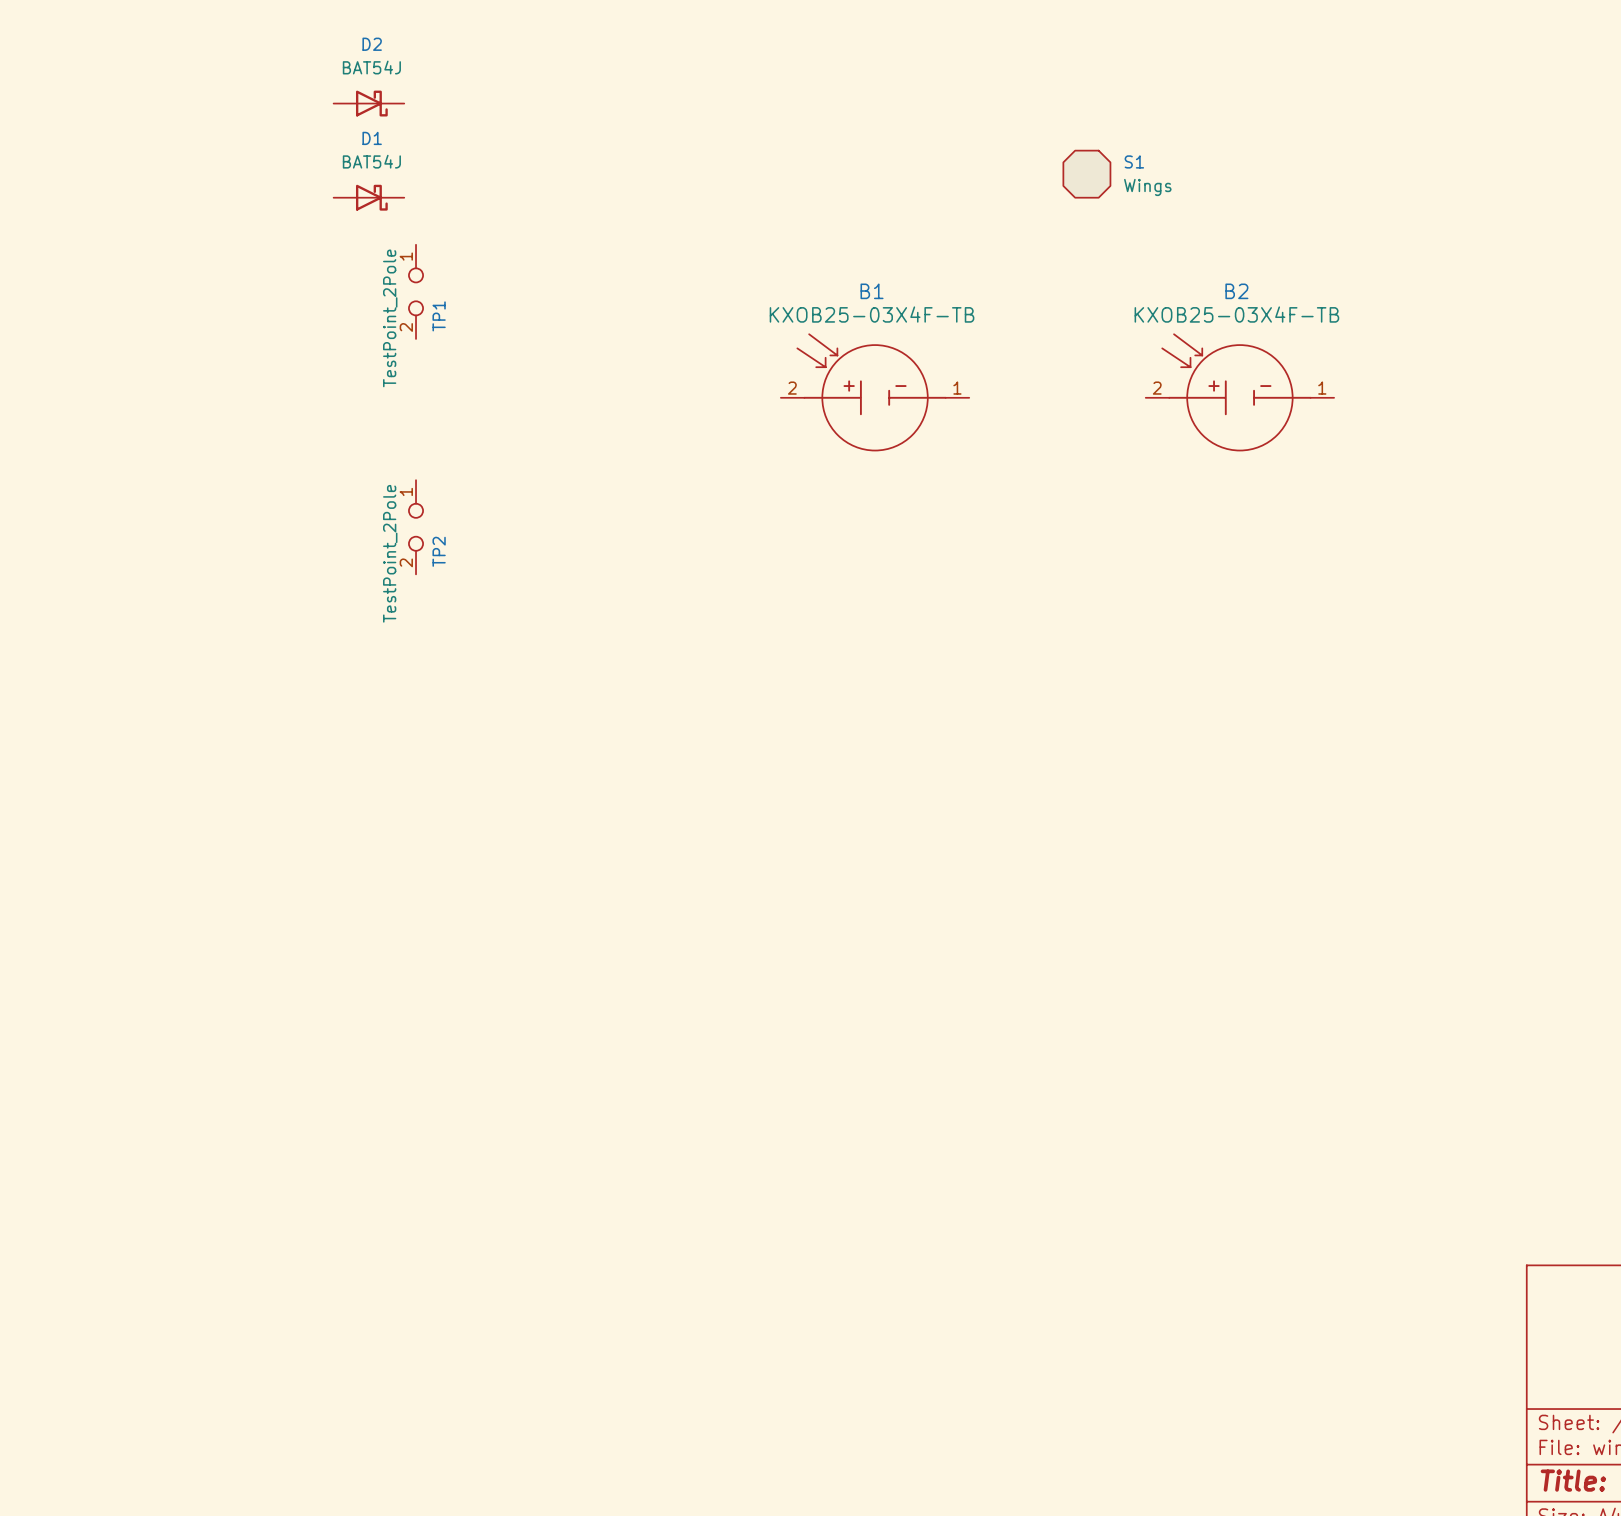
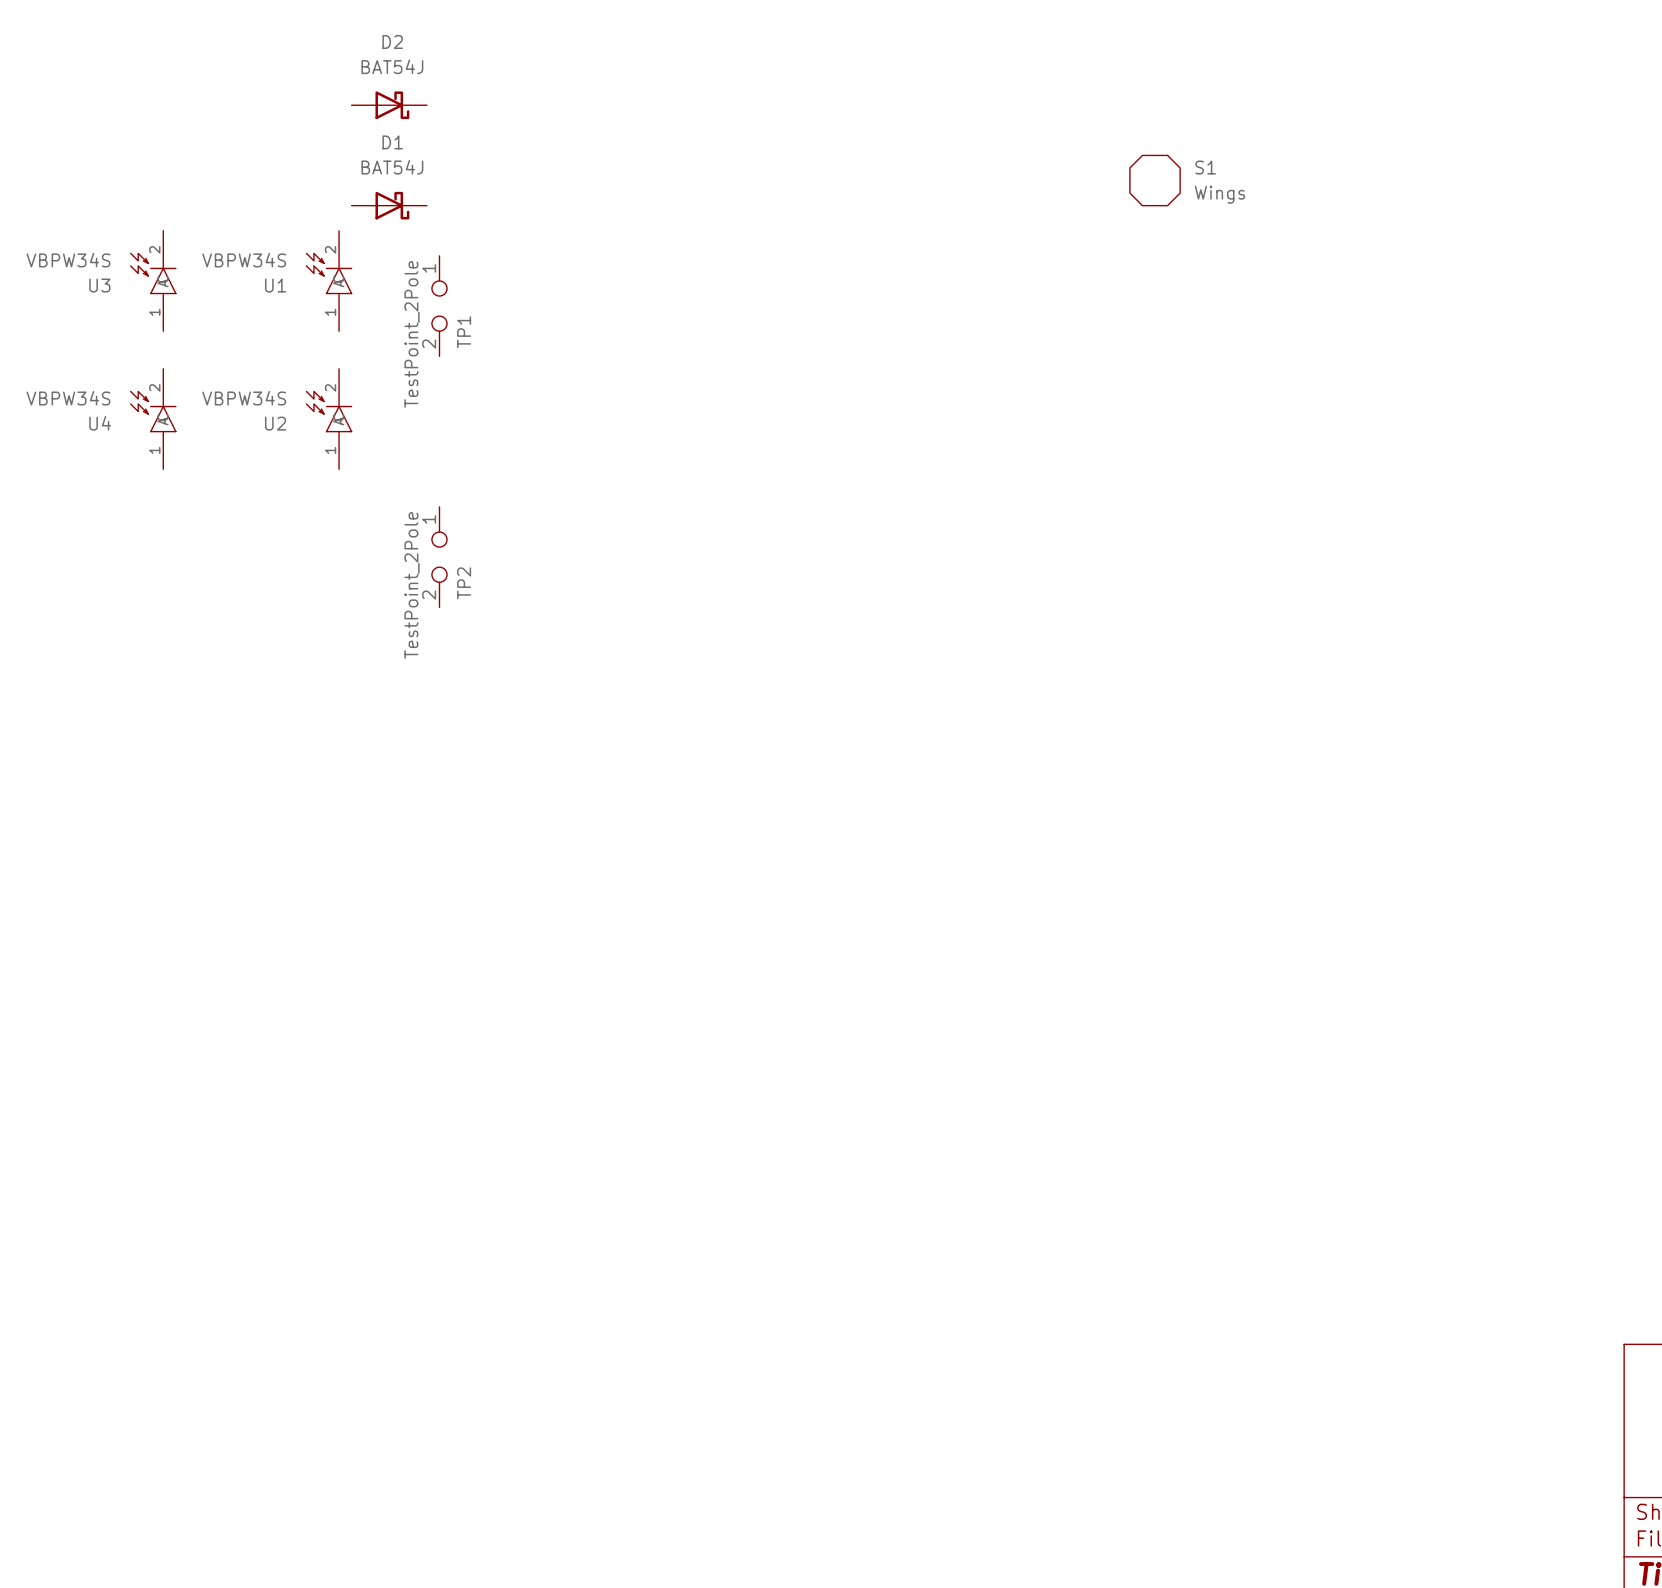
U3: none -> VBPW34S (153, 280)
U1: none -> VBPW34S (329, 280)
B1: KXOB25-03X4F-TB (875, 392) -> none
B2: KXOB25-03X4F-TB (1239, 392) -> none
U4: none -> VBPW34S (153, 419)
U2: none -> VBPW34S (329, 419)

